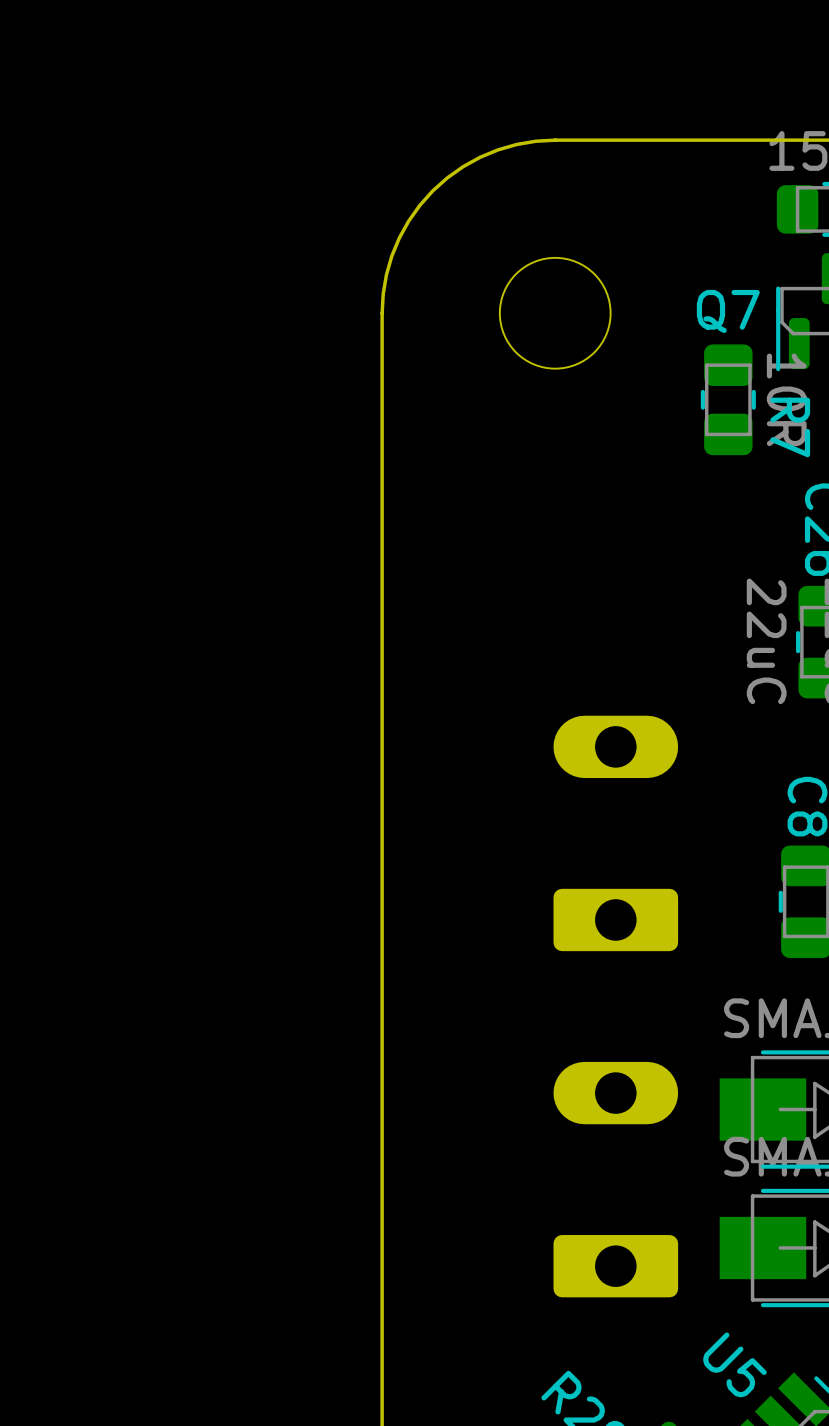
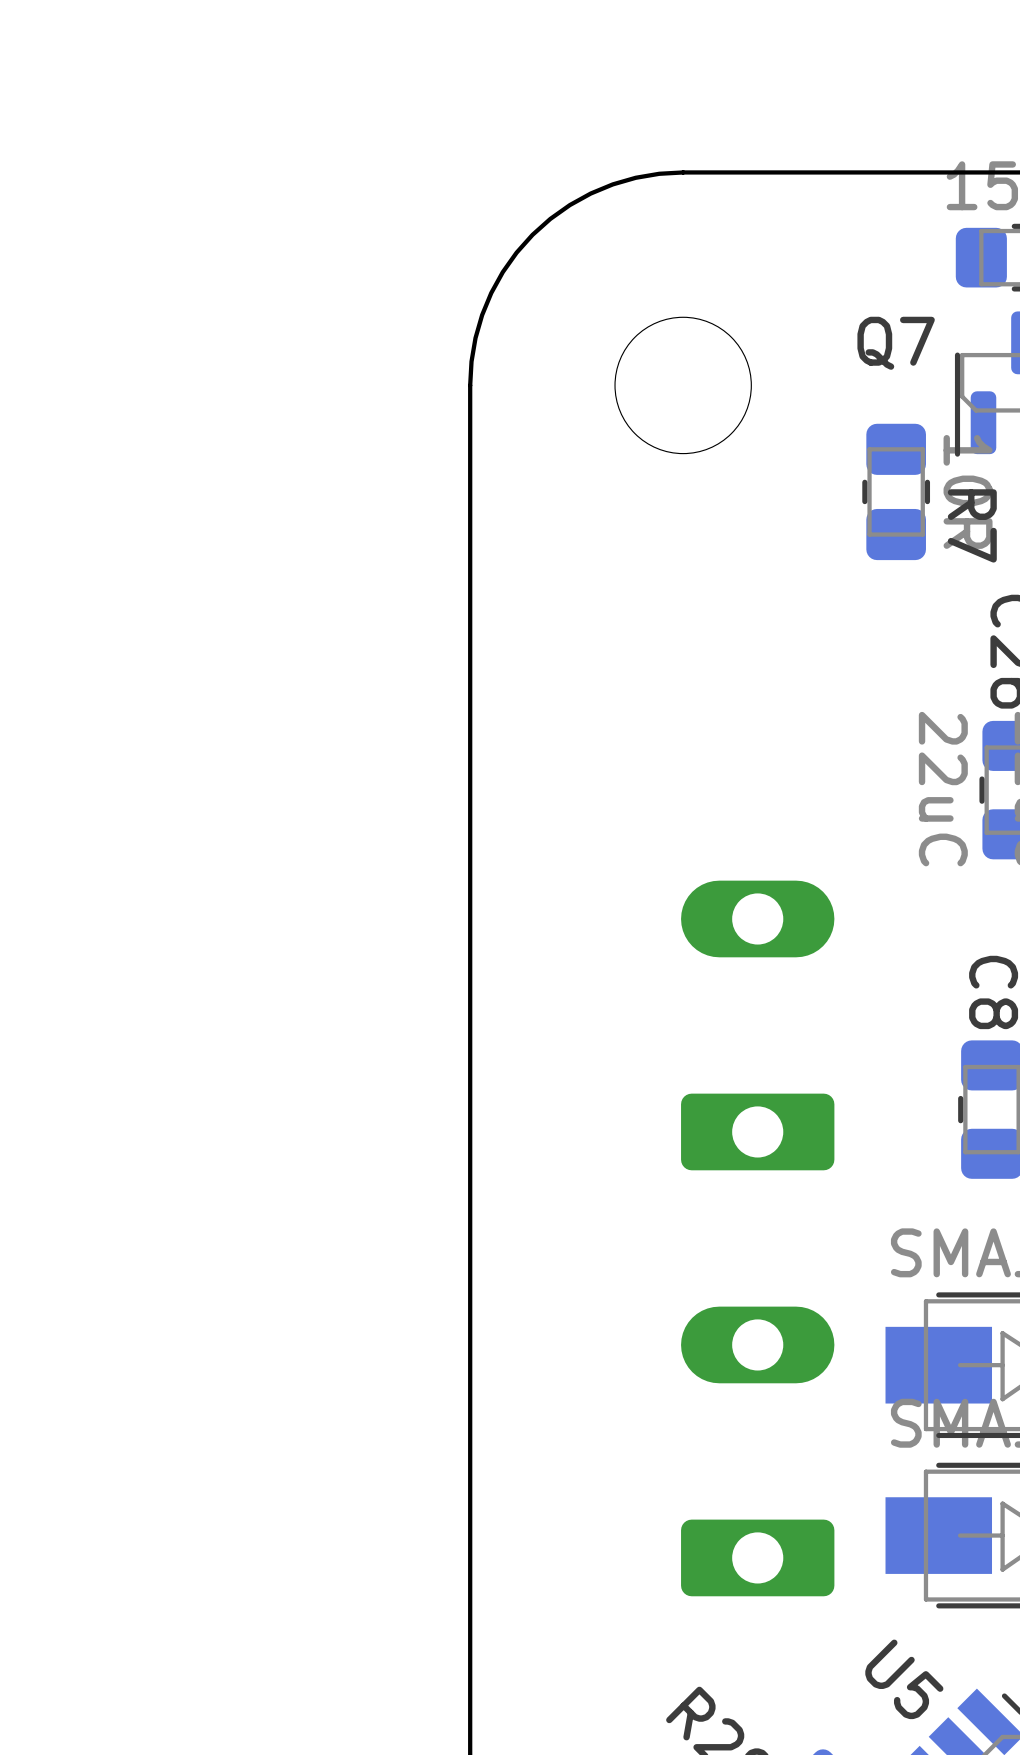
Q7 name position: Q7 (728, 311) -> Q7 (896, 343)

